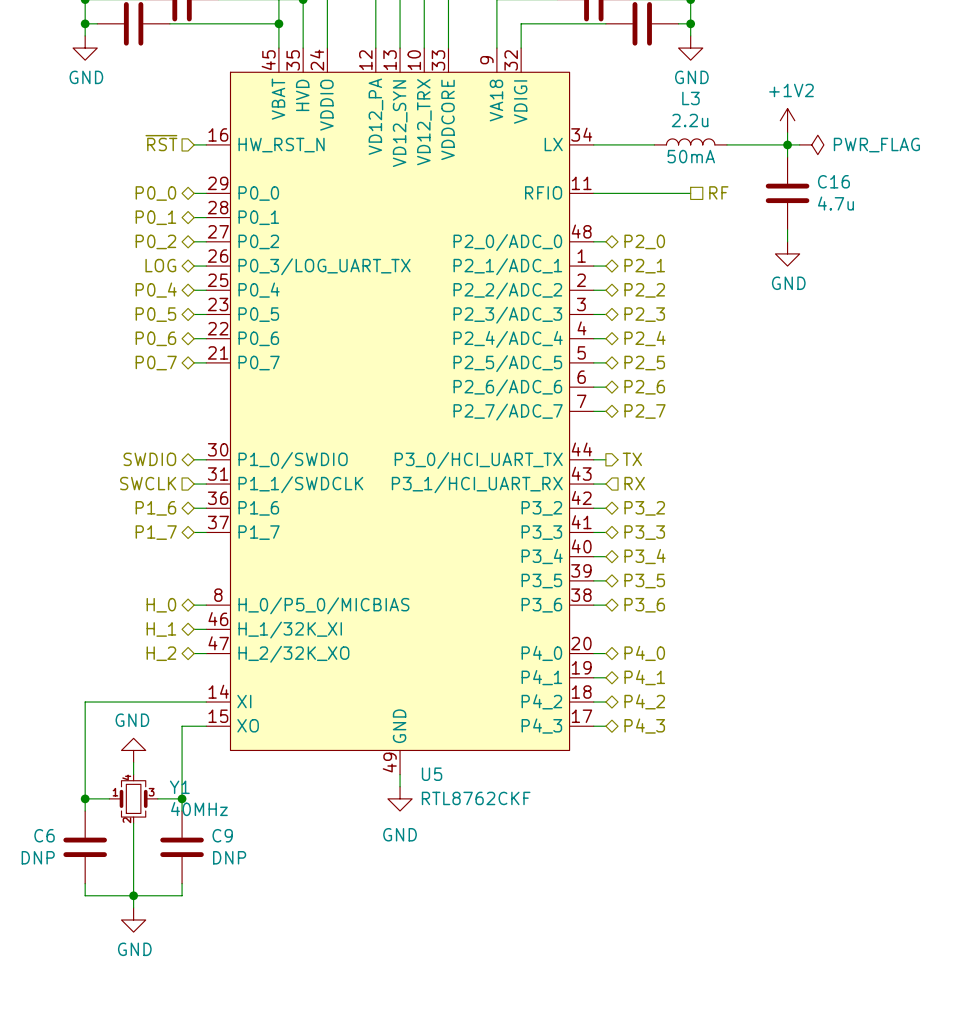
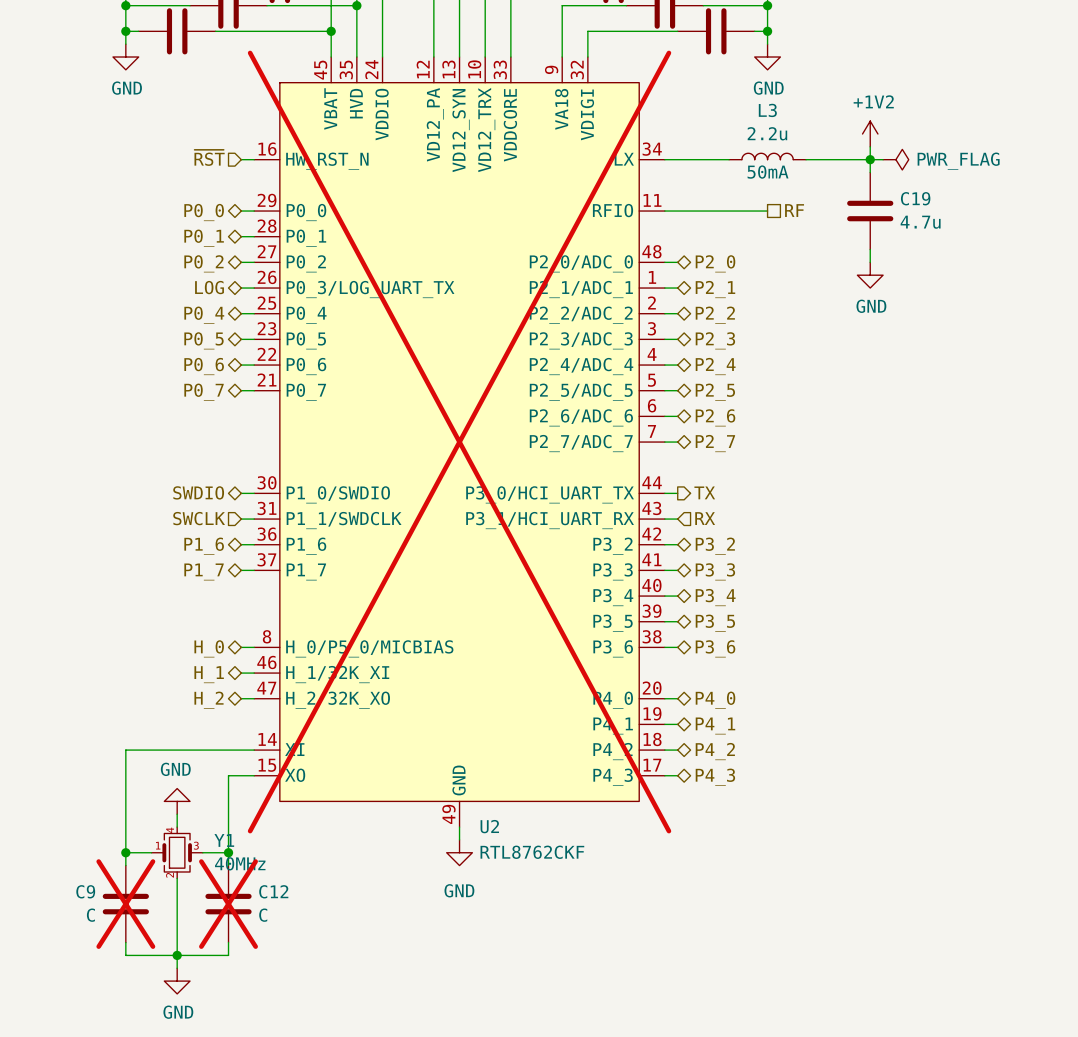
C16 name: C16 (833, 181) -> C19 (915, 198)
U5 do-not-place cross: none -> (459, 442)
U5 name: U5 (432, 774) -> U2 (489, 826)
C6 name: C6 (44, 835) -> C9 (85, 891)
C9 name: C9 (222, 835) -> C12 (273, 891)
C6 do-not-place cross: none -> (125, 904)
C9 do-not-place cross: none -> (228, 904)
C6 value: DNP (38, 857) -> C (90, 915)
C9 value: DNP (229, 857) -> C (263, 915)

